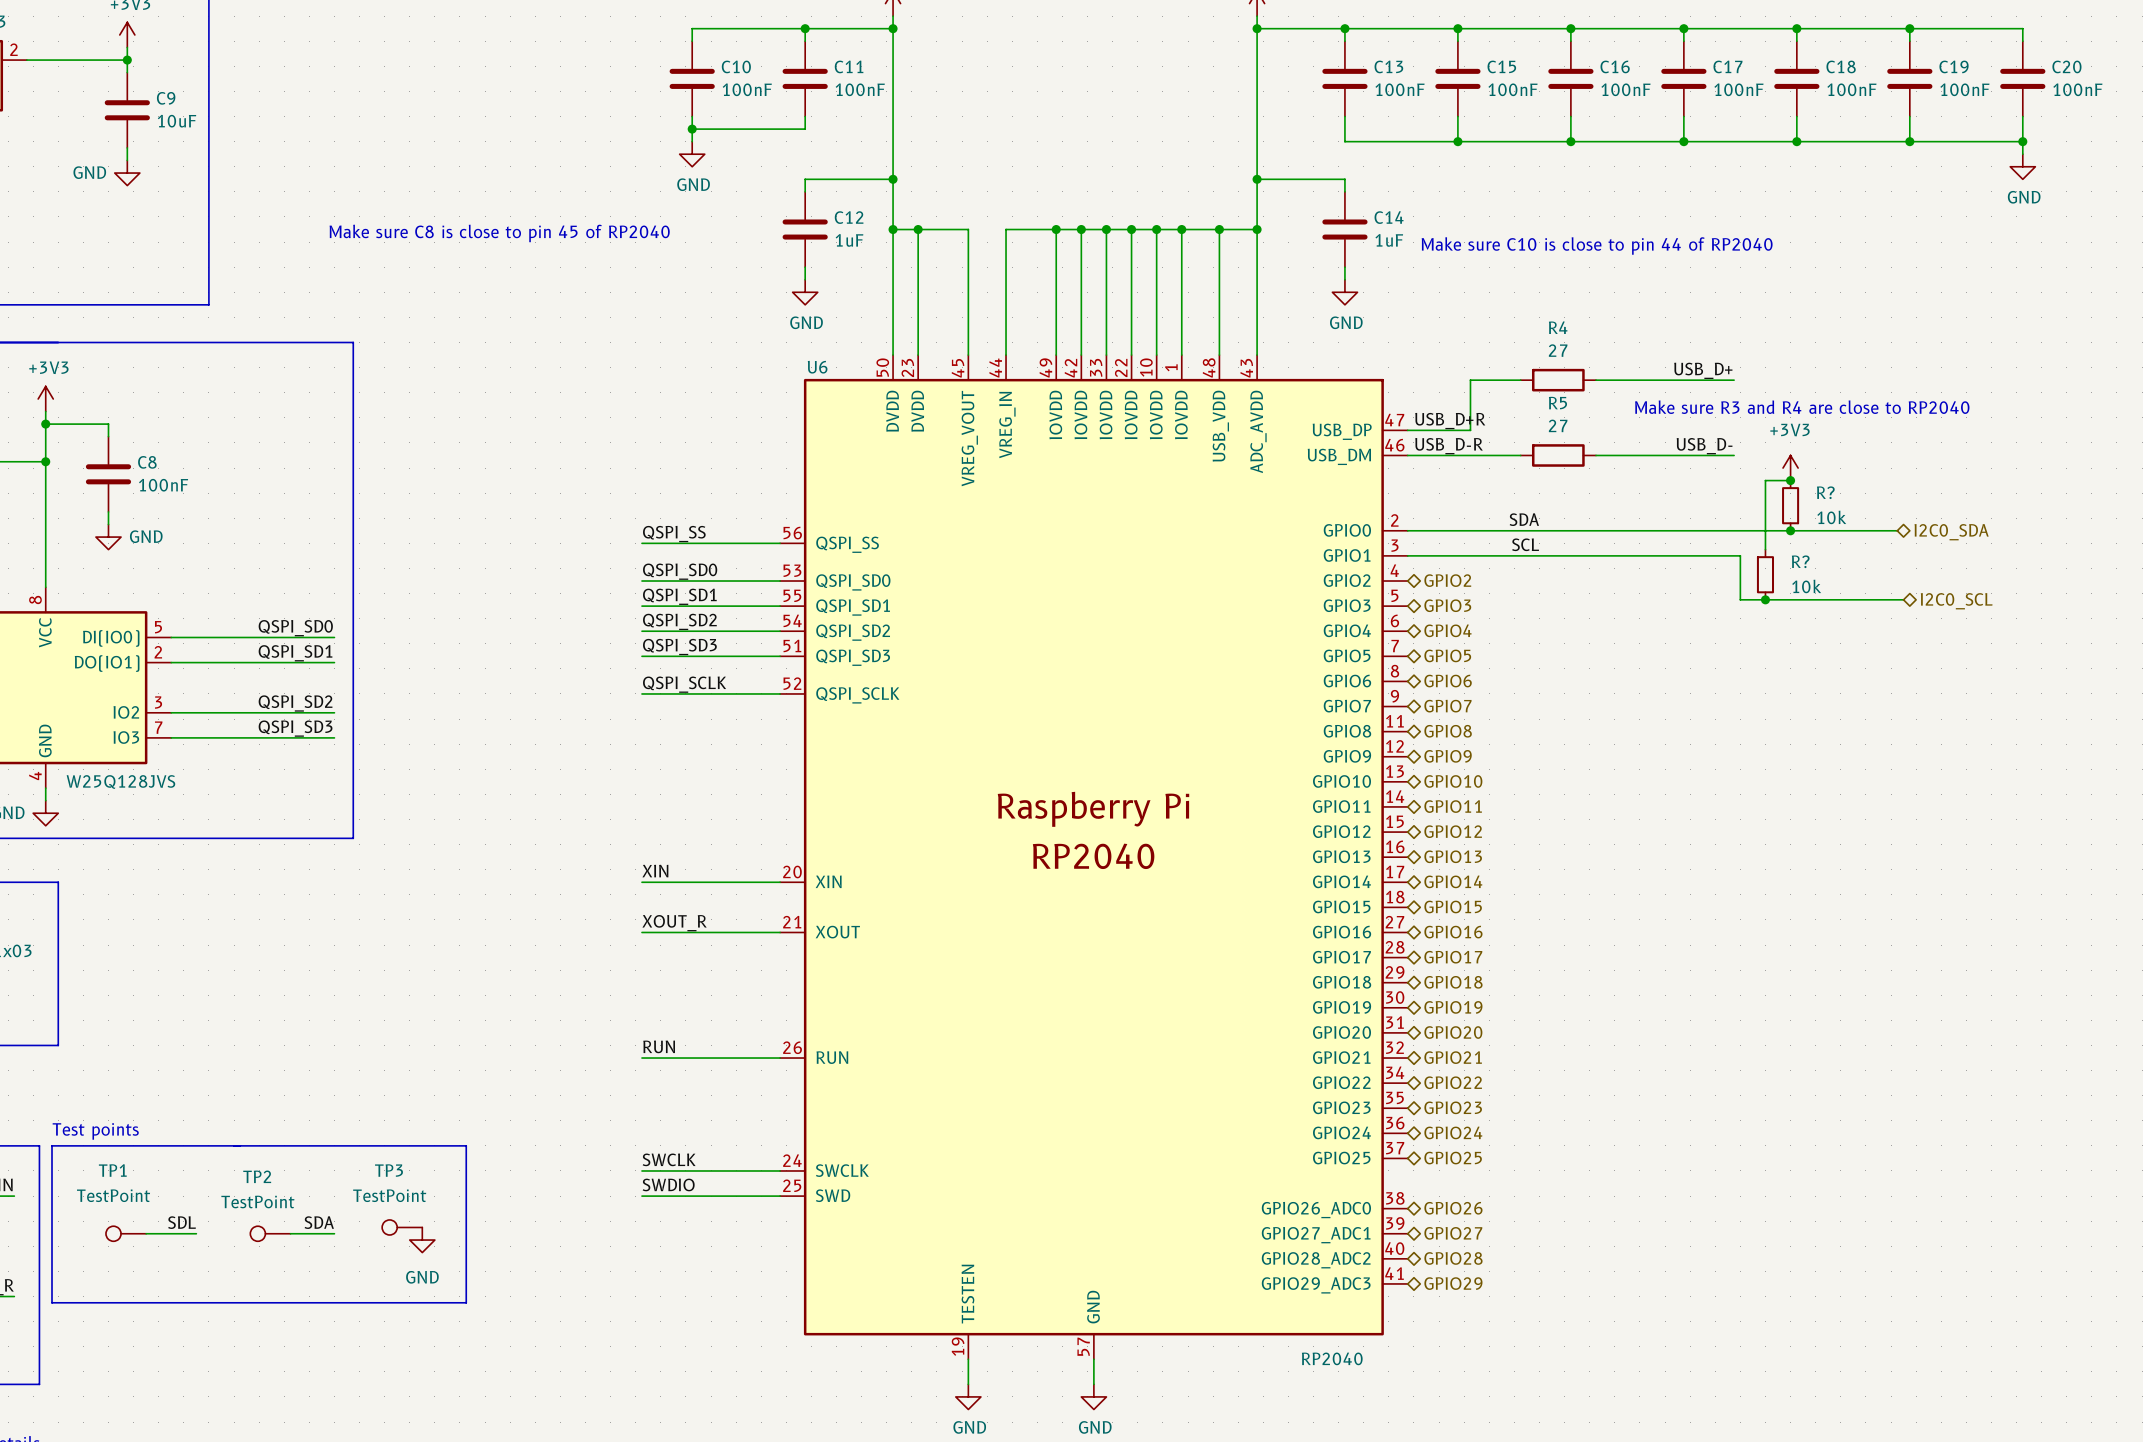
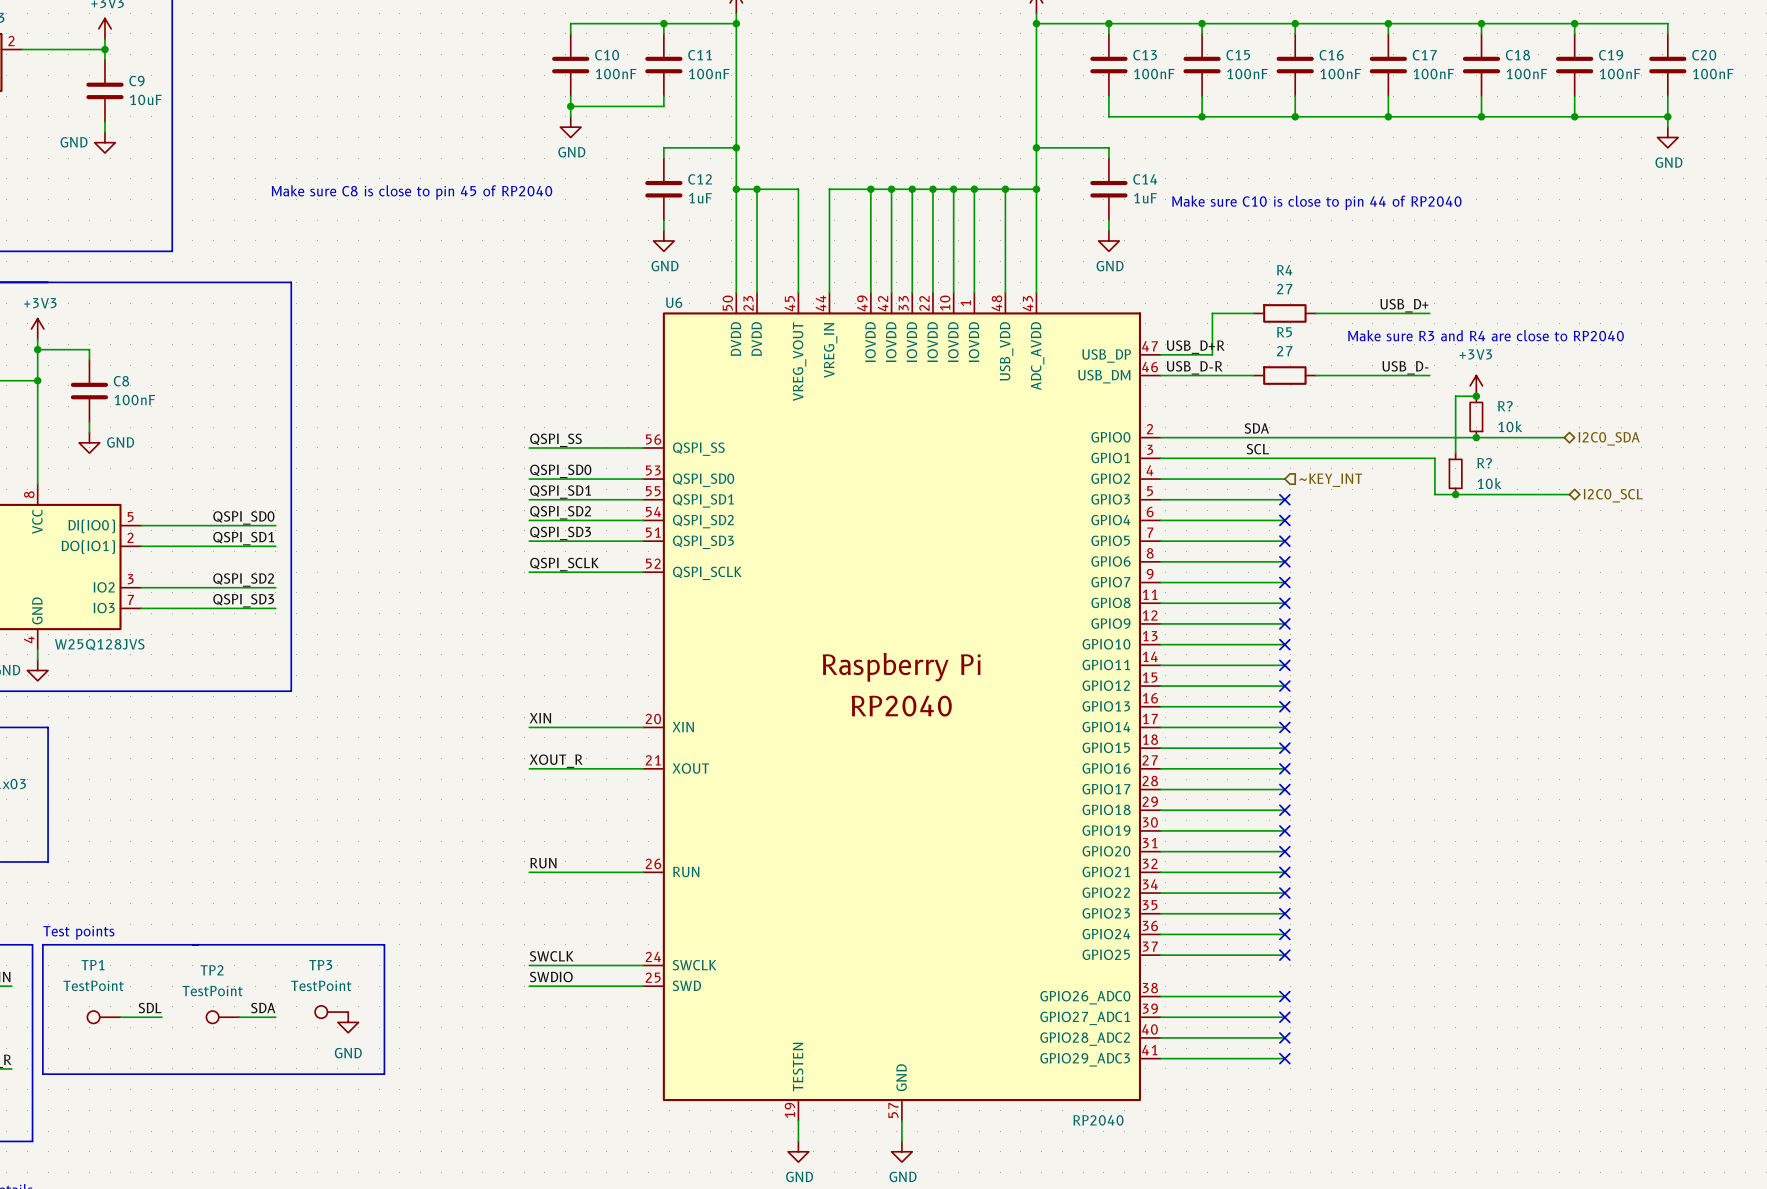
hierarchical label: GPIO2 (1447, 580) -> none
wire: none -> (1160, 479) (1284, 479)
hierarchical label: none -> ~KEY_INT (1330, 480)
hierarchical label: GPIO3 (1447, 605) -> none
wire: none -> (1160, 499) (1284, 499)
no-connect mark: none -> (1284, 499)
hierarchical label: GPIO4 (1447, 630) -> none
wire: none -> (1160, 520) (1284, 520)
no-connect mark: none -> (1284, 520)
hierarchical label: GPIO5 (1447, 655) -> none
wire: none -> (1160, 541) (1284, 541)
no-connect mark: none -> (1284, 541)
wire: none -> (1160, 561) (1284, 561)
hierarchical label: GPIO6 (1448, 681) -> none
no-connect mark: none -> (1284, 561)
wire: none -> (1160, 582) (1284, 582)
hierarchical label: GPIO7 (1447, 706) -> none
no-connect mark: none -> (1284, 582)
wire: none -> (1160, 603) (1284, 603)
hierarchical label: GPIO8 (1448, 731) -> none
no-connect mark: none -> (1284, 603)
wire: none -> (1160, 623) (1284, 623)
hierarchical label: GPIO9 (1448, 756) -> none
no-connect mark: none -> (1284, 623)
wire: none -> (1160, 644) (1284, 644)
hierarchical label: GPIO10 (1453, 781) -> none
no-connect mark: none -> (1284, 644)
wire: none -> (1160, 665) (1284, 665)
hierarchical label: GPIO11 (1453, 806) -> none
no-connect mark: none -> (1284, 665)
hierarchical label: GPIO12 (1453, 831) -> none
wire: none -> (1160, 686) (1284, 686)
no-connect mark: none -> (1284, 686)
hierarchical label: GPIO13 (1453, 856) -> none
wire: none -> (1160, 706) (1284, 706)
no-connect mark: none -> (1284, 706)
hierarchical label: GPIO14 (1453, 881) -> none
wire: none -> (1160, 727) (1284, 727)
no-connect mark: none -> (1284, 727)
hierarchical label: GPIO15 (1453, 906) -> none
wire: none -> (1160, 748) (1284, 748)
no-connect mark: none -> (1284, 748)
wire: none -> (1160, 768) (1284, 768)
hierarchical label: GPIO16 (1453, 932) -> none
no-connect mark: none -> (1284, 768)
wire: none -> (1160, 789) (1284, 789)
hierarchical label: GPIO17 (1453, 957) -> none
no-connect mark: none -> (1284, 789)
wire: none -> (1160, 810) (1284, 810)
hierarchical label: GPIO18 (1453, 982) -> none
no-connect mark: none -> (1284, 810)
wire: none -> (1160, 830) (1284, 830)
hierarchical label: GPIO19 (1453, 1007) -> none
no-connect mark: none -> (1284, 830)
wire: none -> (1160, 851) (1284, 851)
hierarchical label: GPIO20 (1453, 1032) -> none
no-connect mark: none -> (1284, 851)
hierarchical label: GPIO21 (1453, 1057) -> none
wire: none -> (1160, 872) (1284, 872)
no-connect mark: none -> (1284, 872)
hierarchical label: GPIO22 (1453, 1082) -> none
wire: none -> (1160, 893) (1284, 893)
no-connect mark: none -> (1284, 893)
hierarchical label: GPIO23 (1453, 1107) -> none
wire: none -> (1160, 913) (1284, 913)
no-connect mark: none -> (1284, 913)
hierarchical label: GPIO24 (1453, 1132) -> none
wire: none -> (1160, 934) (1284, 934)
no-connect mark: none -> (1284, 934)
wire: none -> (1160, 955) (1284, 955)
hierarchical label: GPIO25 (1453, 1158) -> none
no-connect mark: none -> (1284, 955)
wire: none -> (1160, 996) (1284, 996)
hierarchical label: GPIO26 (1453, 1208) -> none
no-connect mark: none -> (1284, 996)
wire: none -> (1160, 1017) (1284, 1017)
hierarchical label: GPIO27 (1453, 1233) -> none
no-connect mark: none -> (1284, 1017)
wire: none -> (1160, 1037) (1284, 1037)
hierarchical label: GPIO28 (1453, 1258) -> none
no-connect mark: none -> (1284, 1037)
wire: none -> (1160, 1058) (1284, 1058)
hierarchical label: GPIO29 (1453, 1283) -> none
no-connect mark: none -> (1284, 1058)

